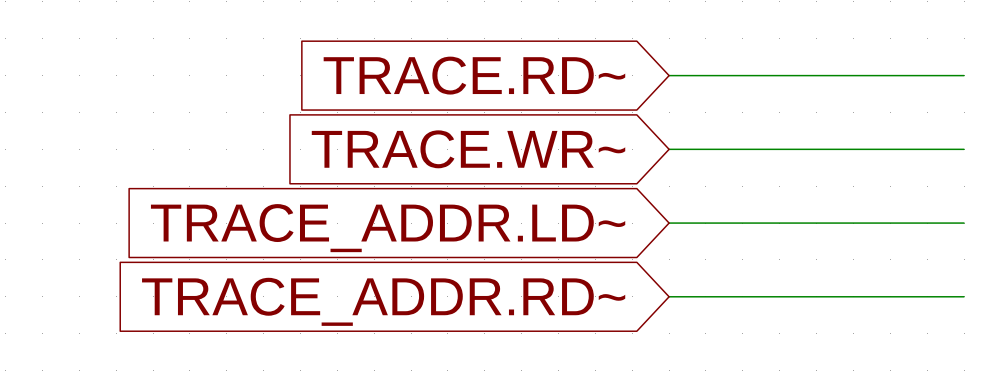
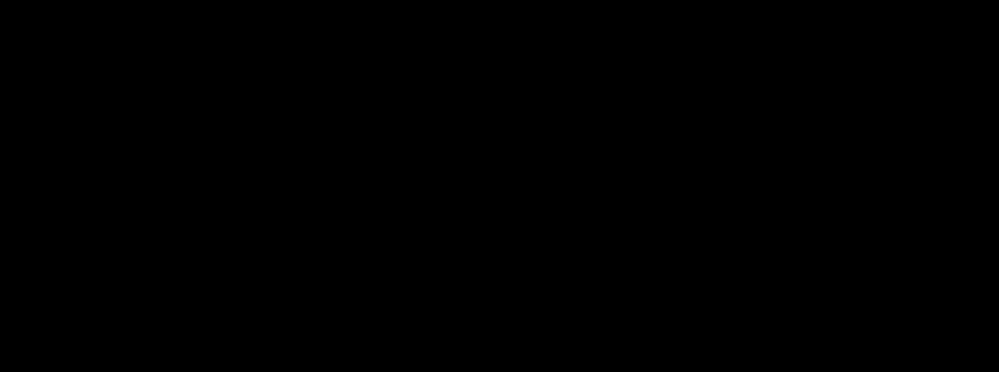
global label: TRACE.RD~ (474, 75) -> none
wire: (669, 75) (964, 75) -> none
global label: TRACE.WR~ (468, 149) -> none
wire: (669, 149) (964, 149) -> none
wire: (669, 223) (964, 223) -> none
global label: TRACE_ADDR.LD~ (388, 228) -> none
wire: (669, 296) (964, 296) -> none
global label: TRACE_ADDR.RD~ (383, 301) -> none

